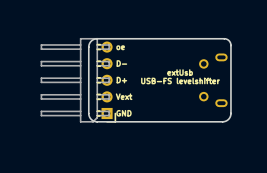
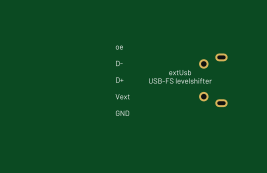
board edge: (224, 38) (92, 39) (88, 47) (89, 117) (97, 121) (226, 120) (230, 113) (230, 45) (229, 40) (224, 38) -> none
part: (78, 80) -> none

